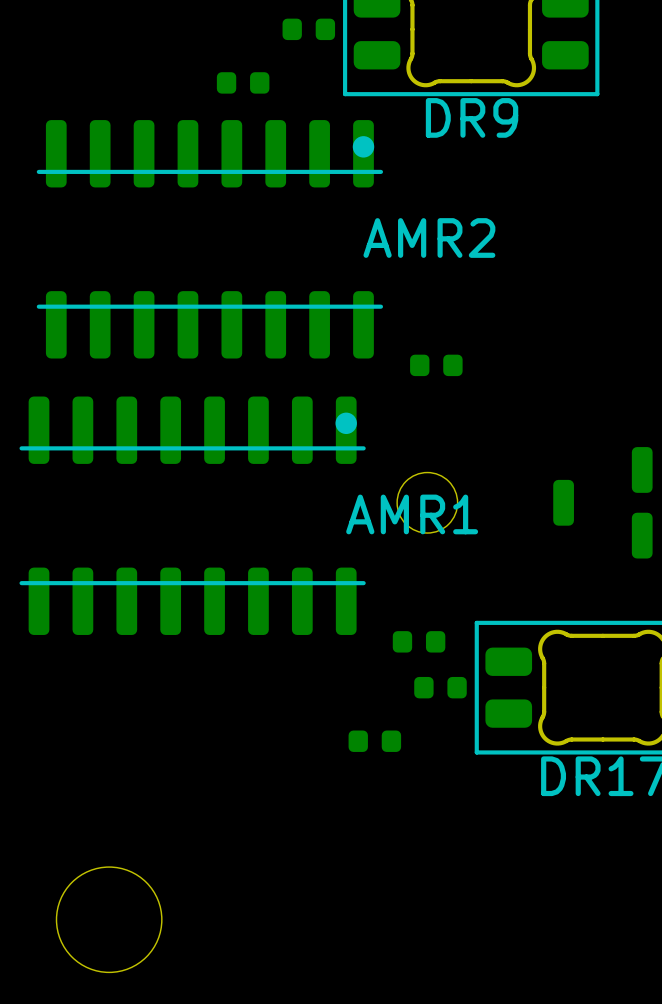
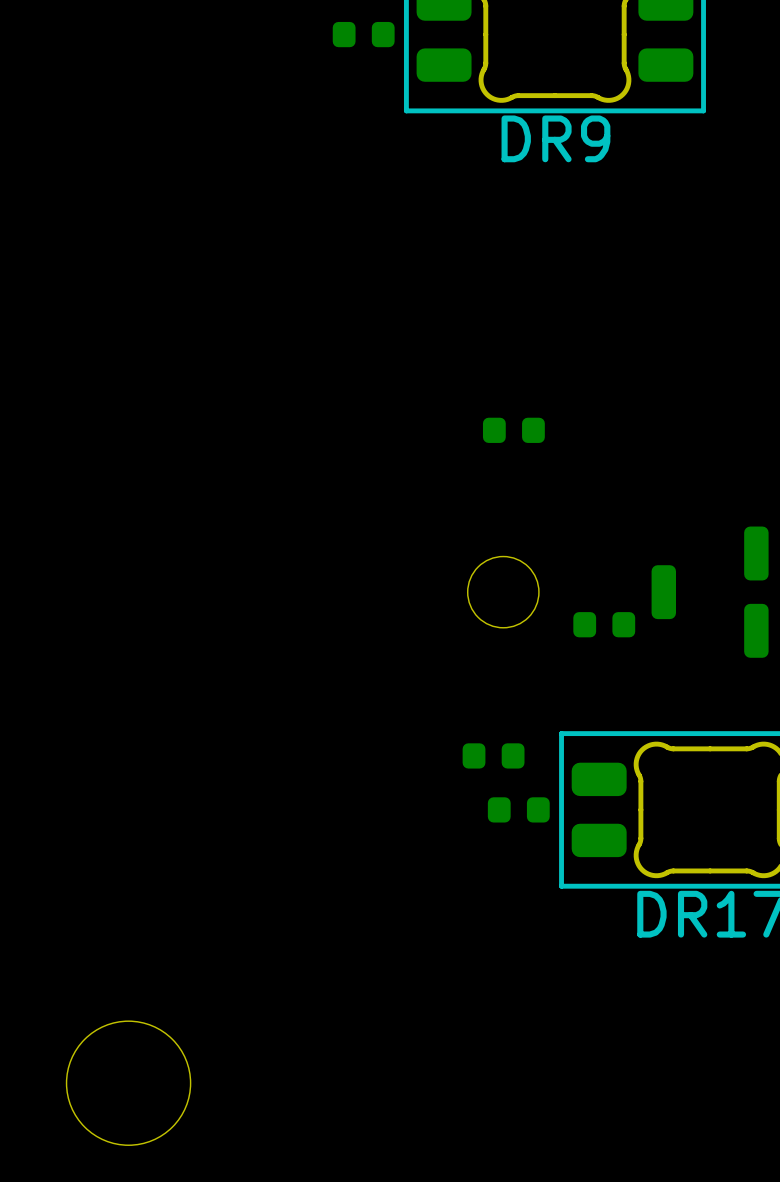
part: (243, 82) -> none
AMR2: (209, 239) -> none
AMR1: (192, 515) -> none
part: none -> (604, 624)
part: (374, 741) -> none

